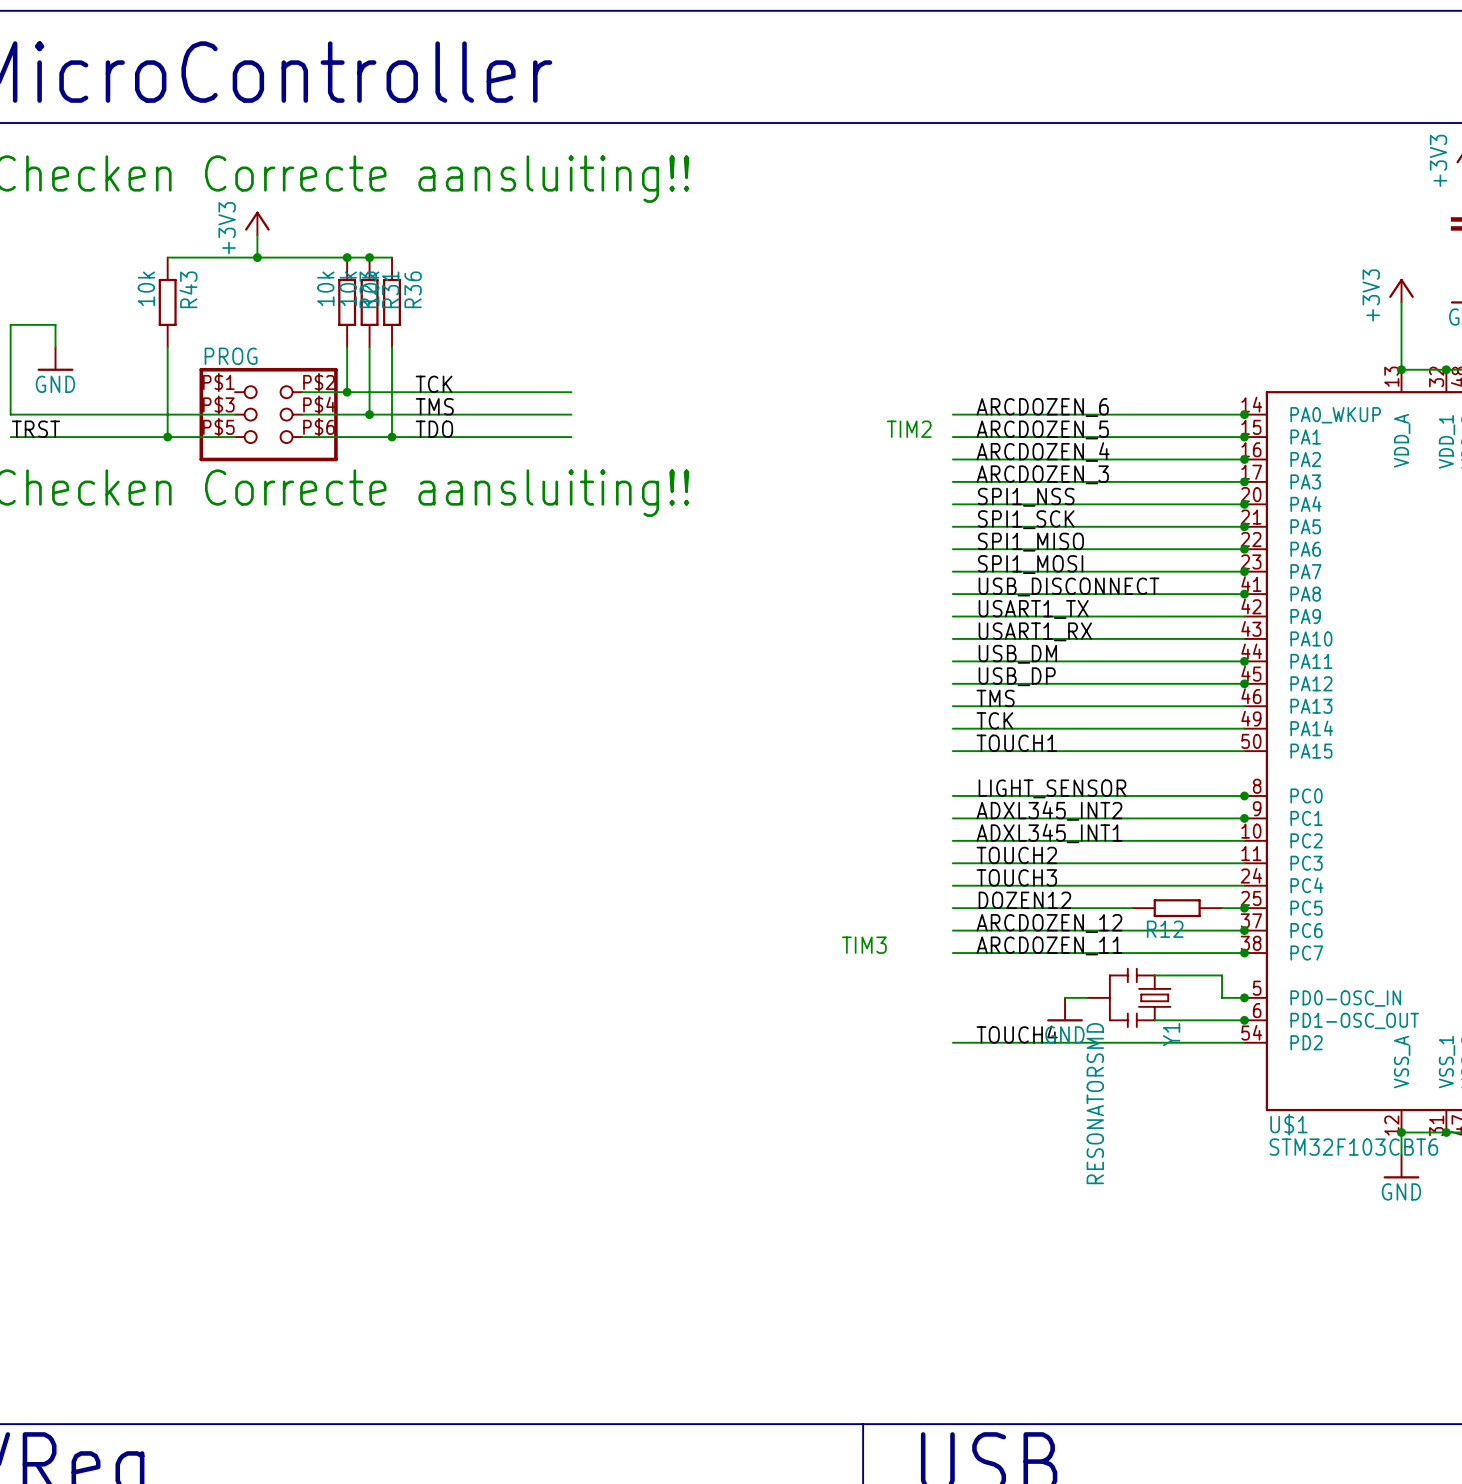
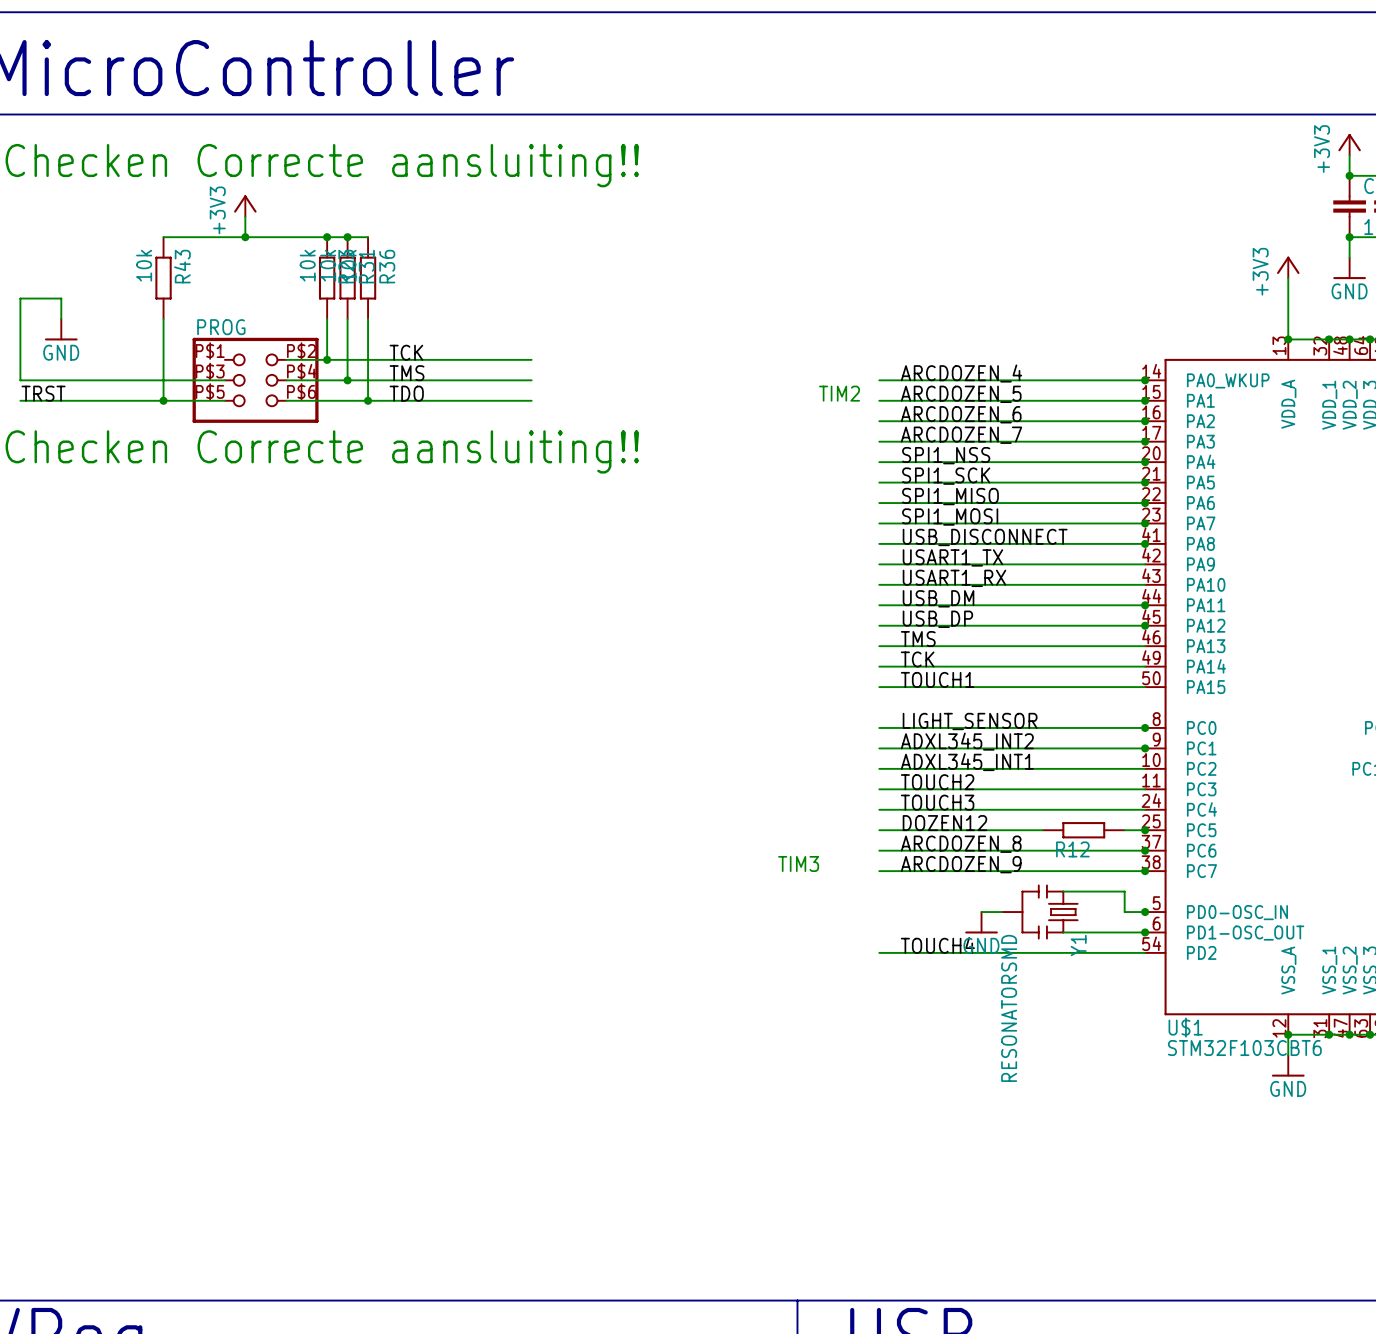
label: ARCDOZEN_6 (1042, 407) -> ARCDOZEN_4 (961, 373)
label: ARCDOZEN_4 (1043, 452) -> ARCDOZEN_6 (961, 414)
label: ARCDOZEN_3 (1042, 474) -> ARCDOZEN_7 (961, 435)
label: ARCDOZEN_12 (1049, 923) -> ARCDOZEN_8 (961, 844)
label: ARCDOZEN_11 (1049, 945) -> ARCDOZEN_9 (961, 864)

